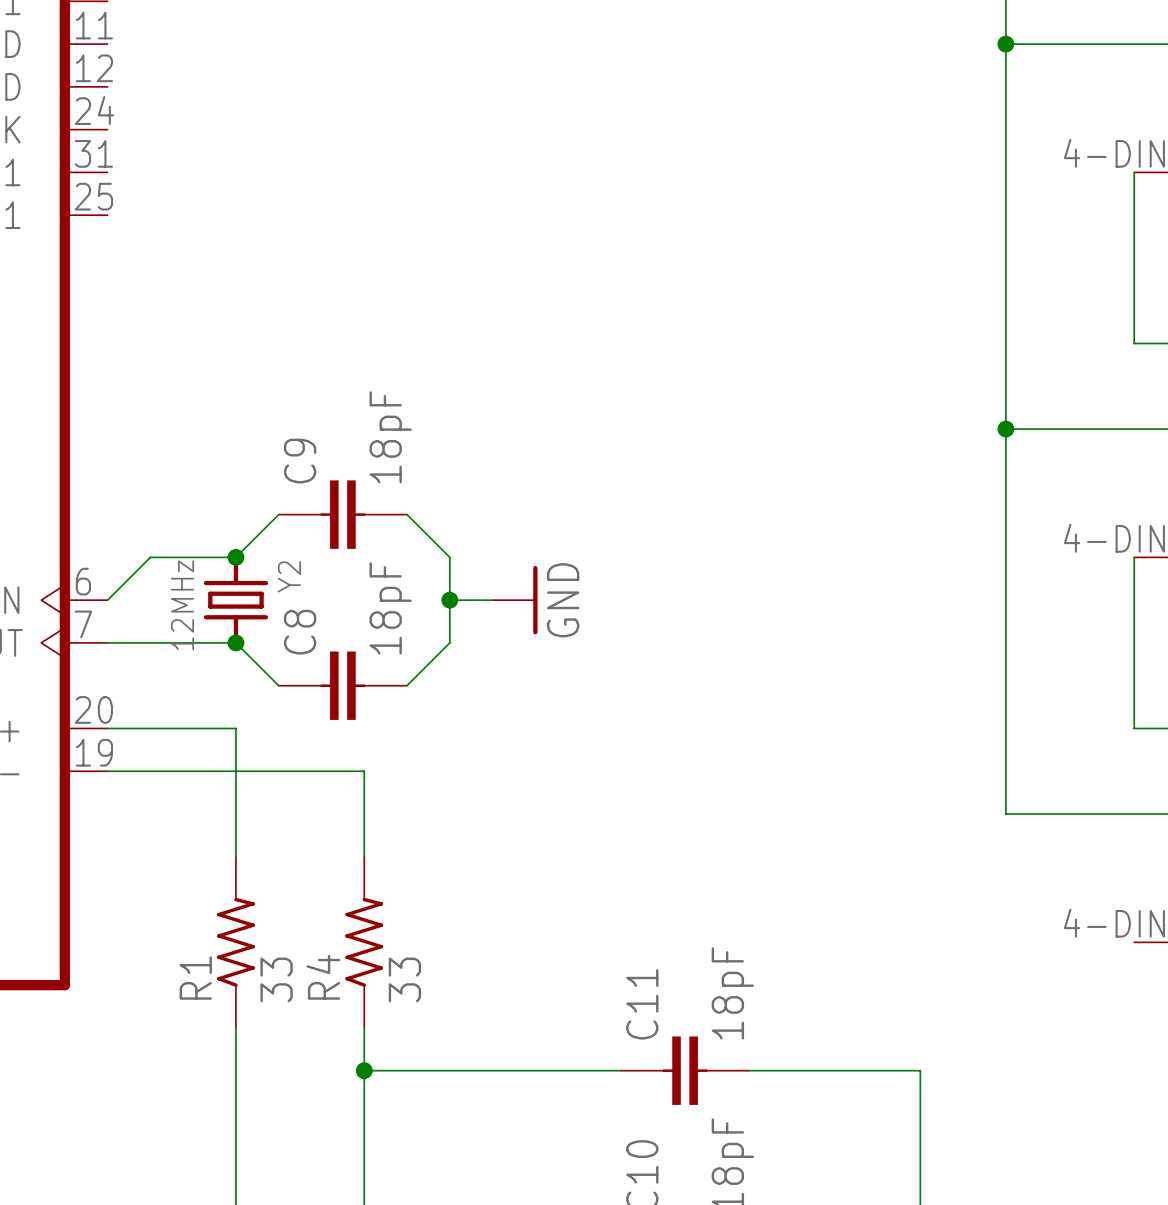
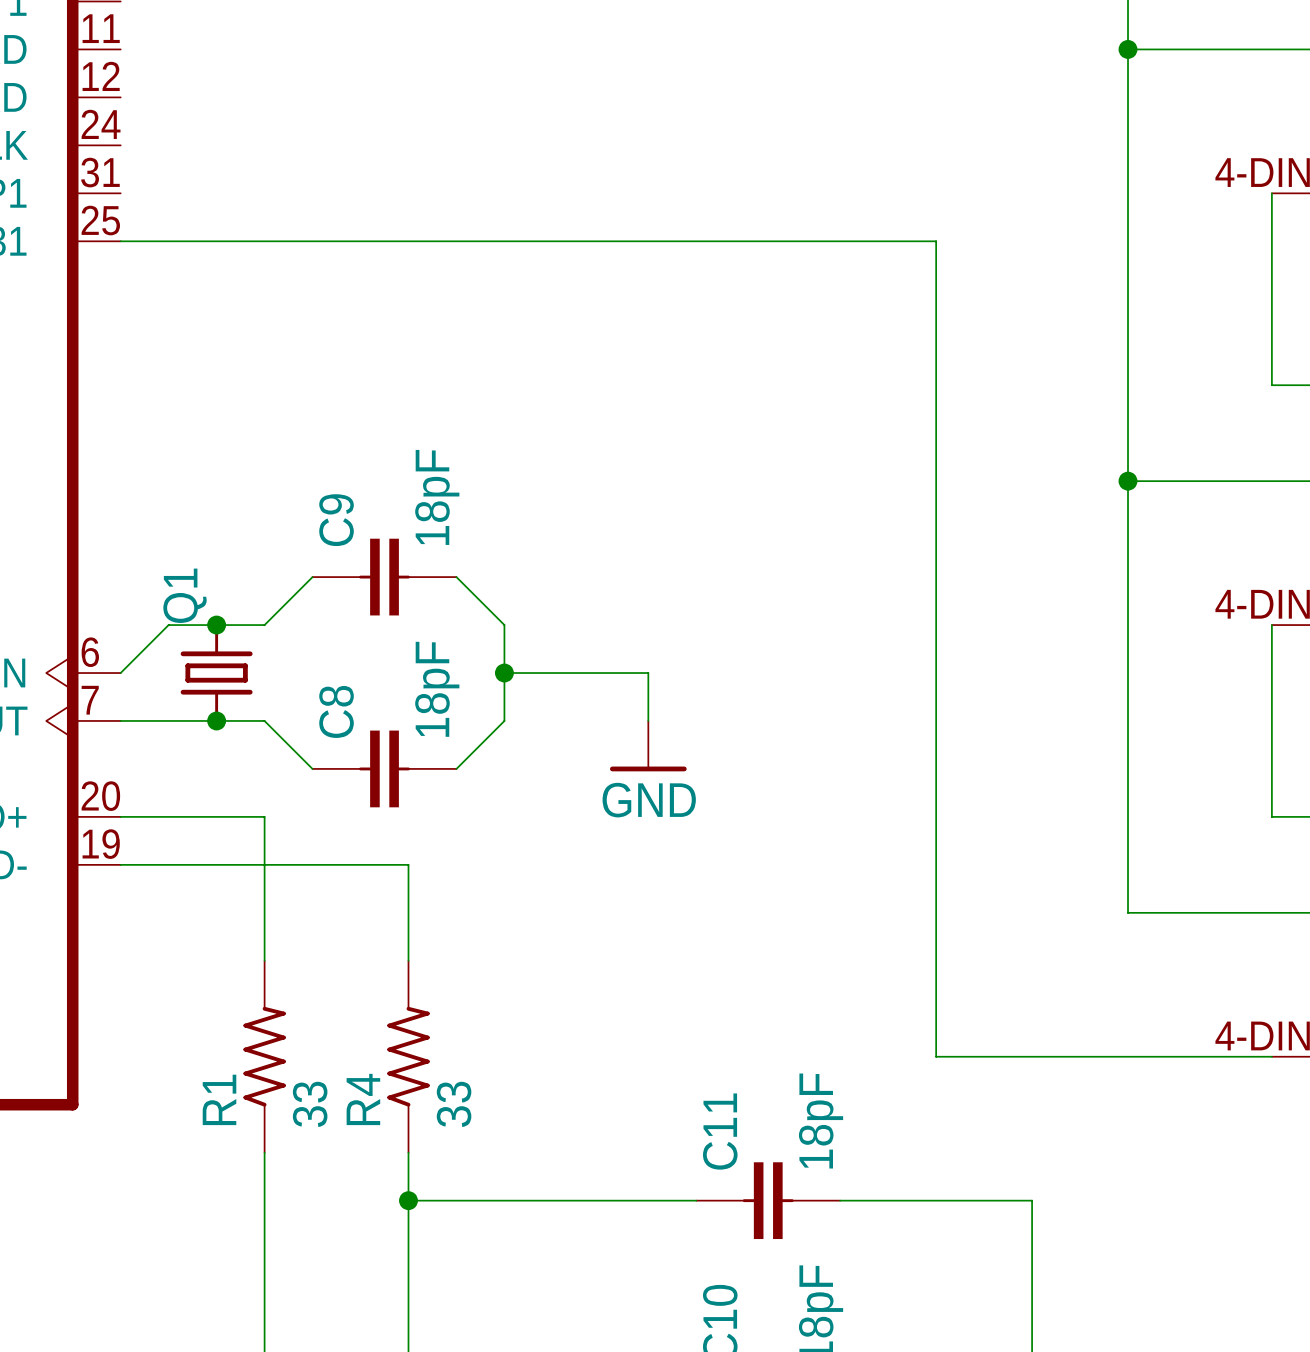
wire: none -> (120, 241) (936, 241) (936, 1056) (1271, 1056)
junction position: (235, 557) -> (216, 625)
Q1: none -> (216, 673)
Y2: 12MHz (235, 600) -> none
wire: none -> (552, 673) (648, 673) (648, 720)
power symbol position: GND (515, 600) -> GND (648, 746)
power symbol rotation: 0° (535, 600) -> 90° clockwise (648, 768)
junction position: (235, 642) -> (216, 720)

